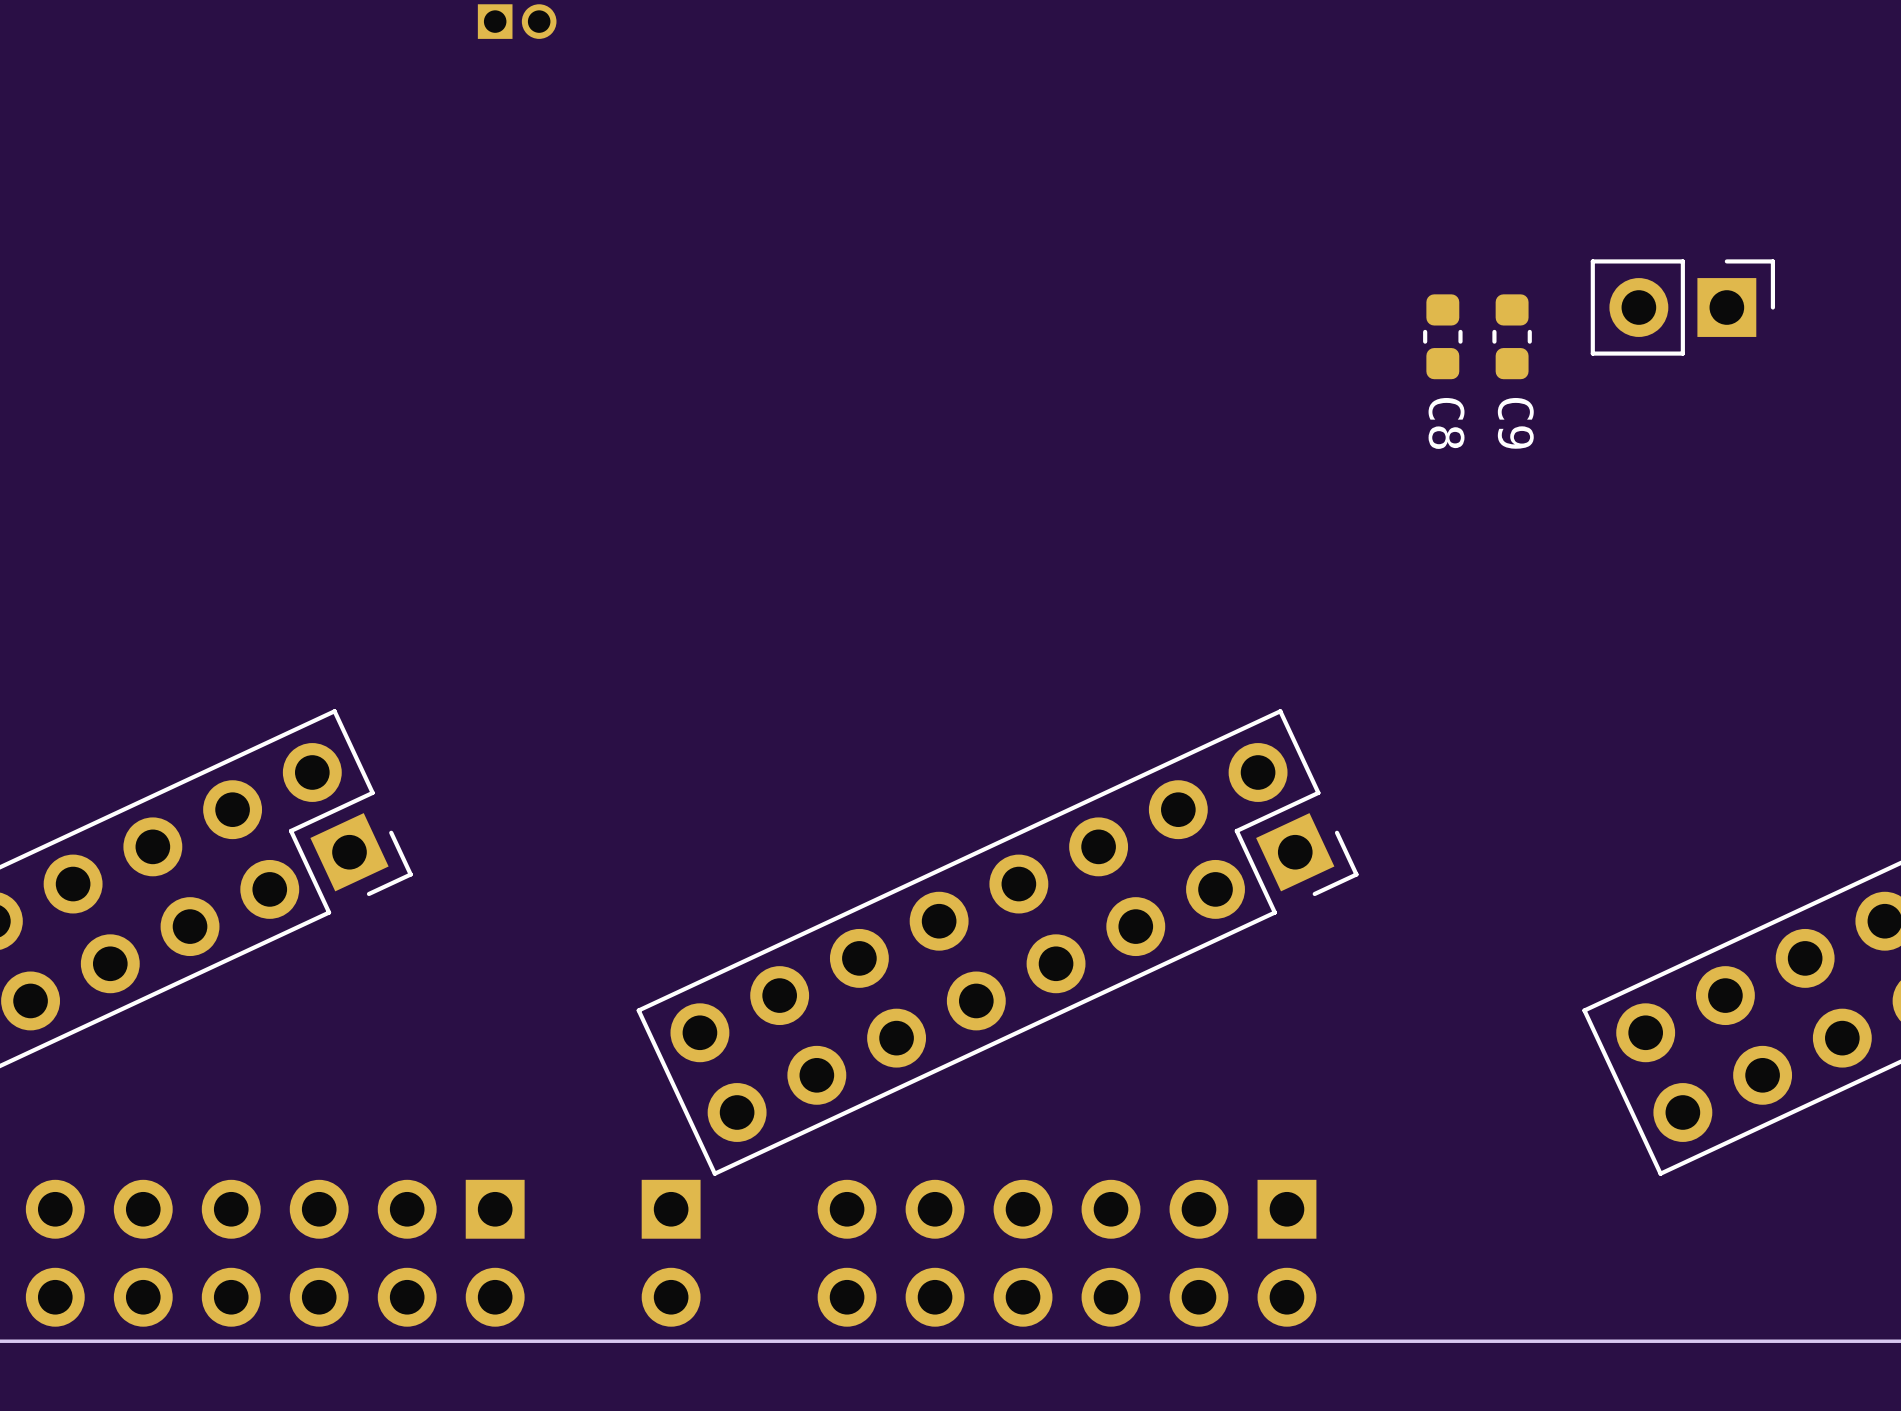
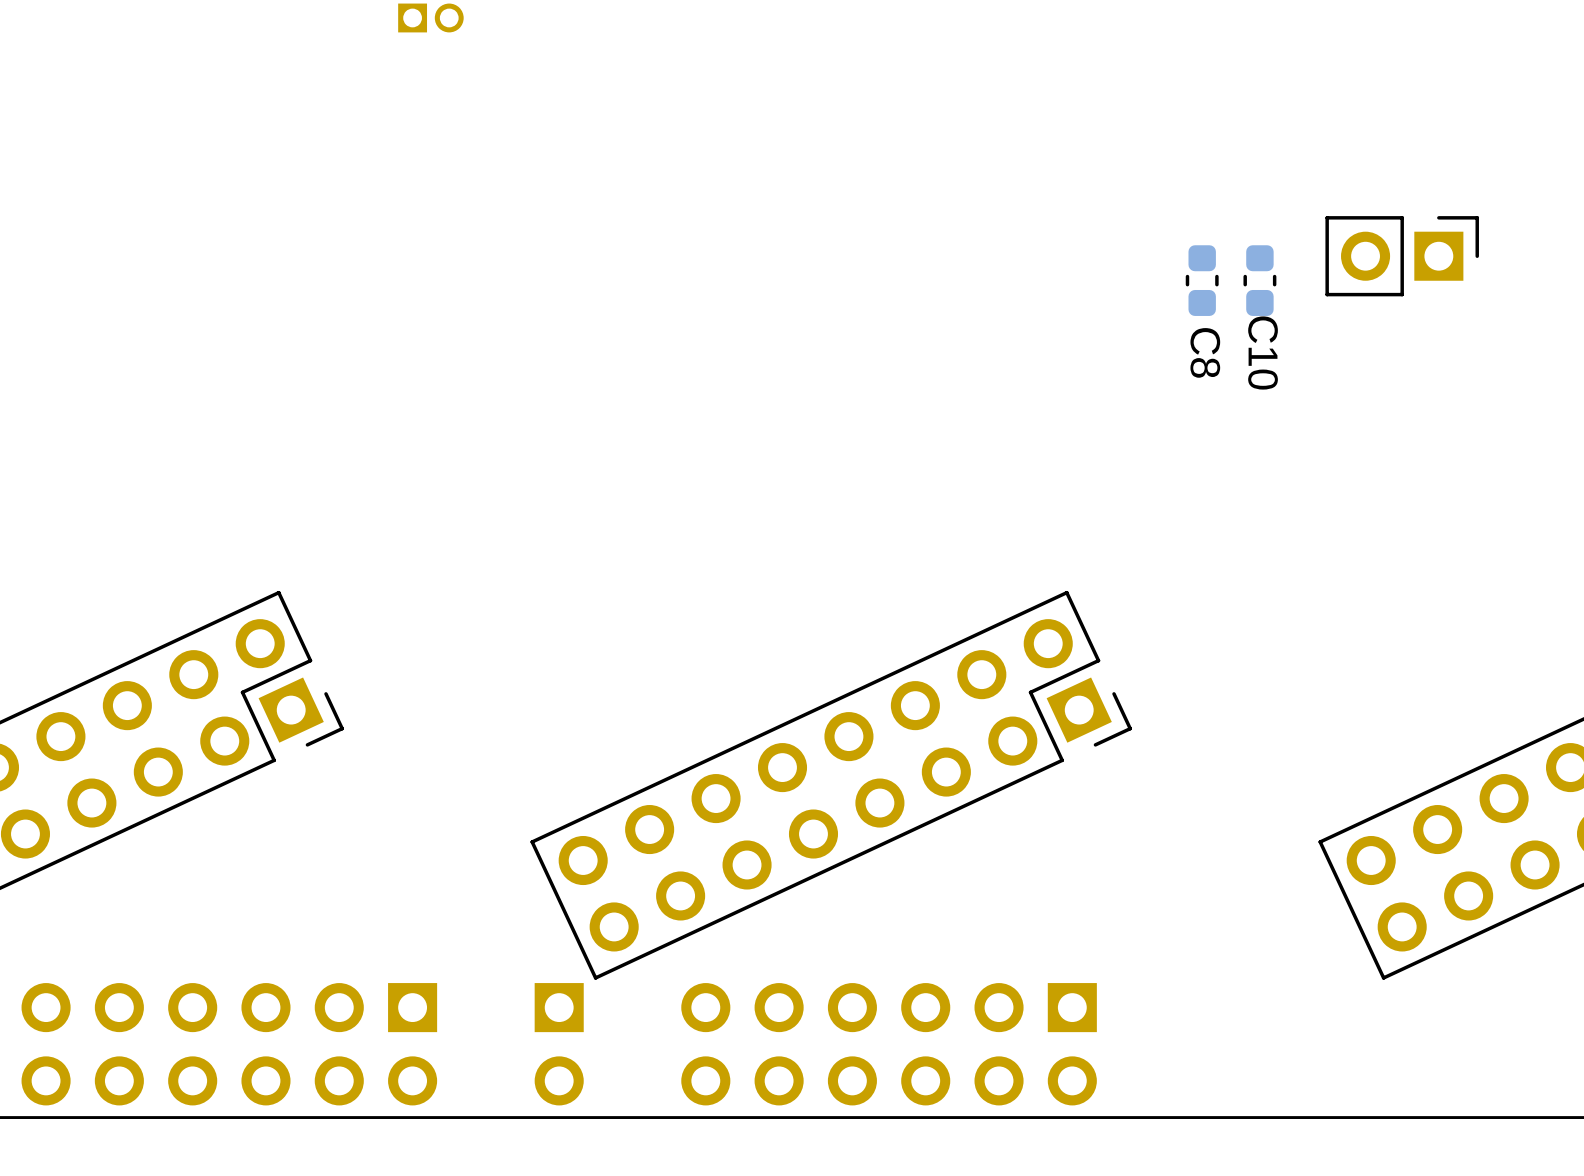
C9 name: C9 (1515, 423) -> C10 (1263, 353)

